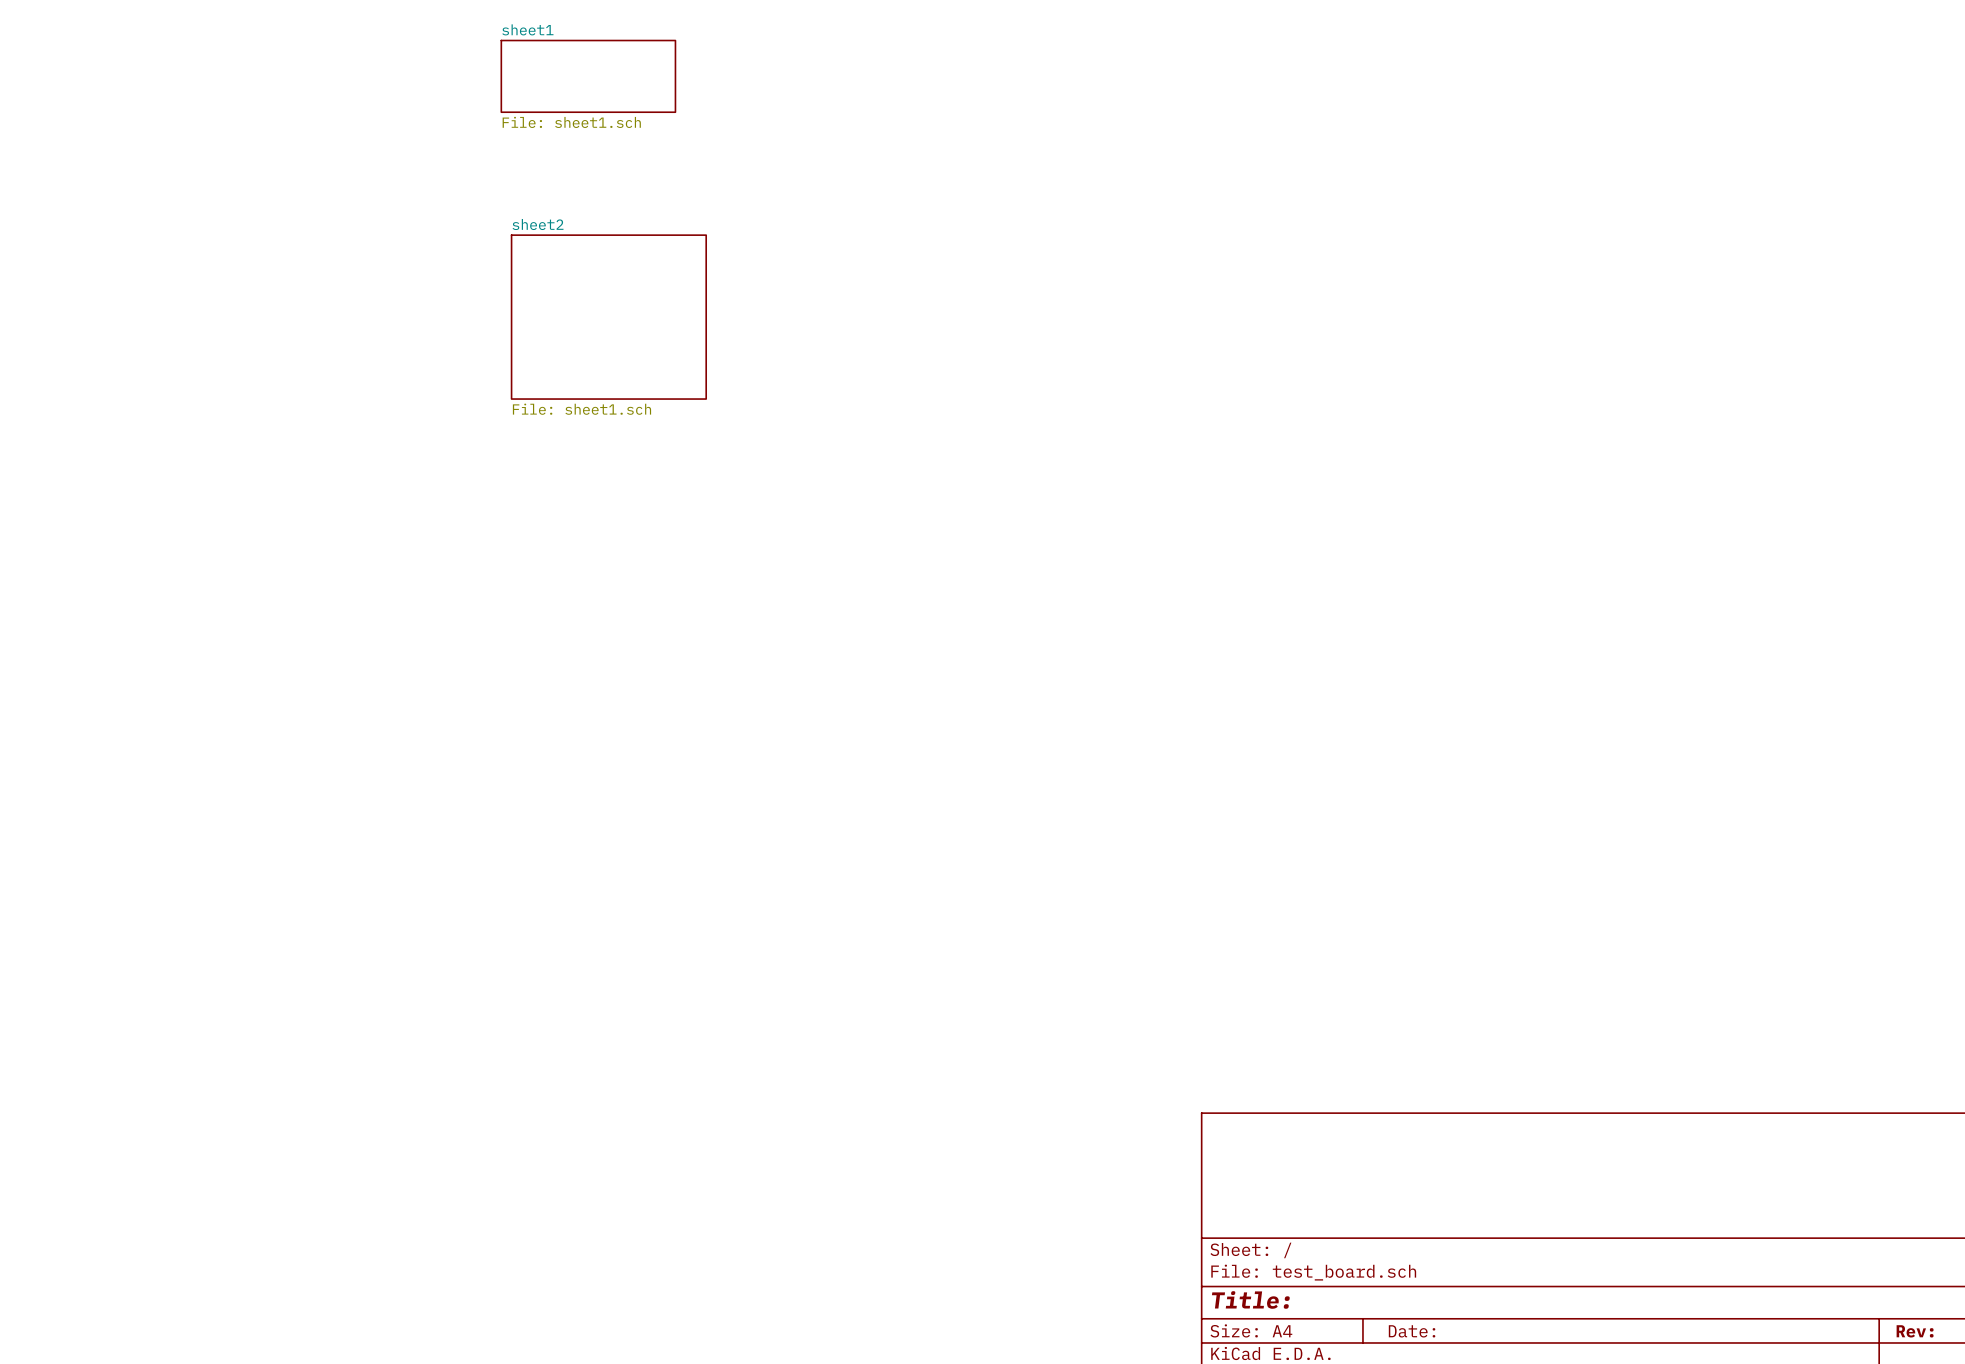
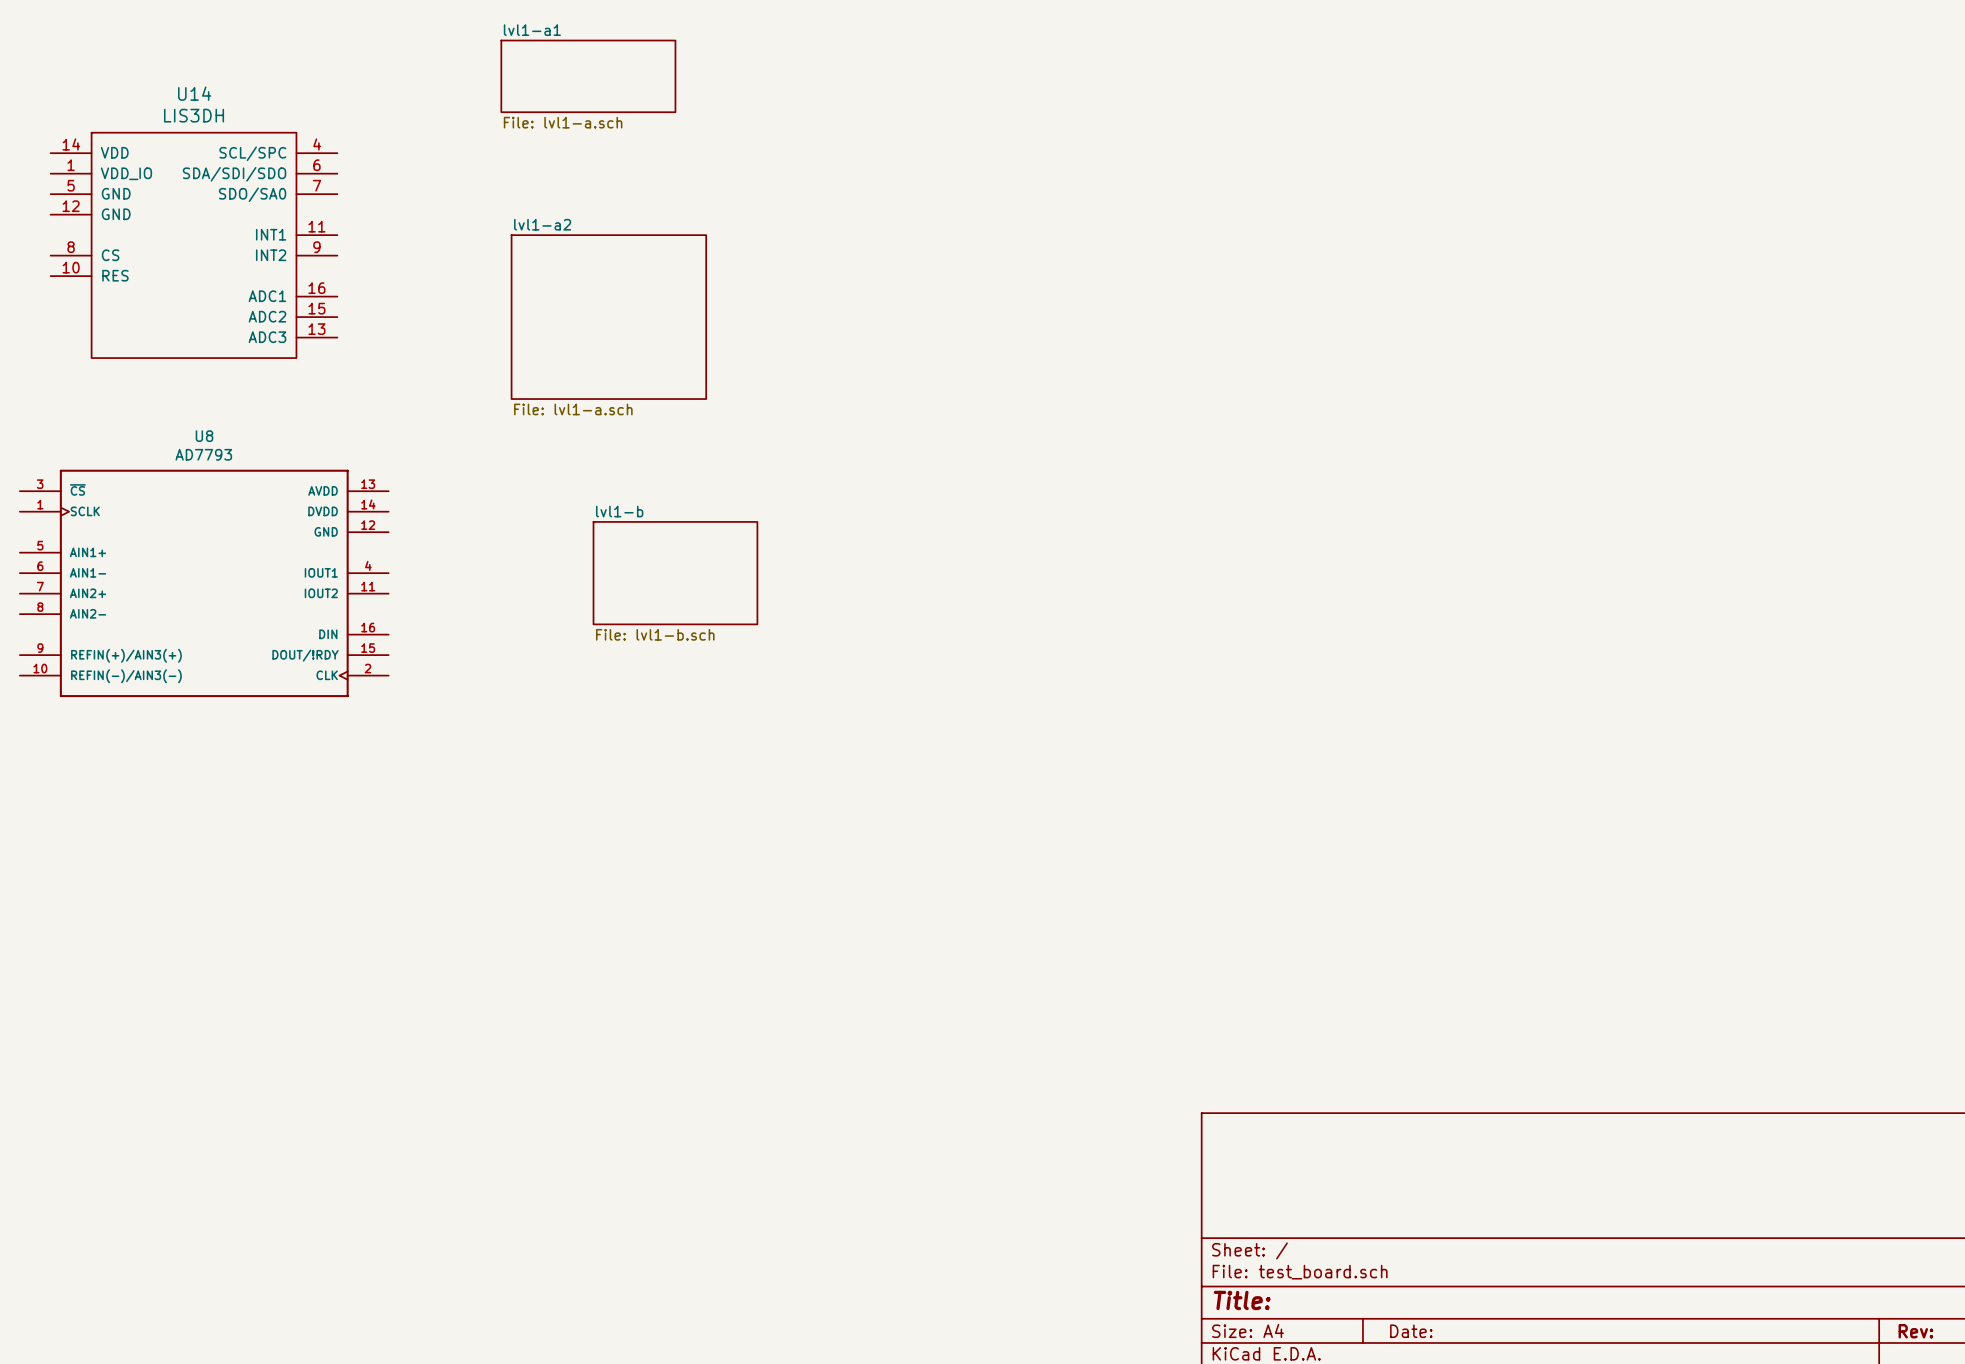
sheet sheet1 name: sheet1 (527, 29) -> lvl1-a1 (532, 30)
sheet sheet1 value: File: sheet1.sch (571, 122) -> File: lvl1-a.sch (563, 122)
sheet sheet2 name: sheet2 (538, 224) -> lvl1-a2 (542, 224)
U14: none -> LIS3DH (194, 245)
sheet sheet2 value: File: sheet1.sch (581, 409) -> File: lvl1-a.sch (573, 409)
sheet lvl1-b: none -> File: lvl1-b.sch (675, 573)
U8: none -> AD7793 (204, 583)

